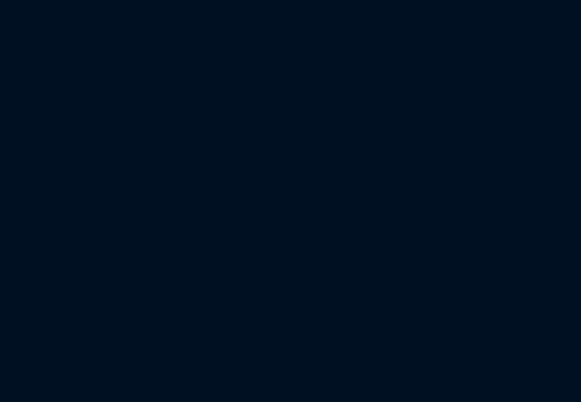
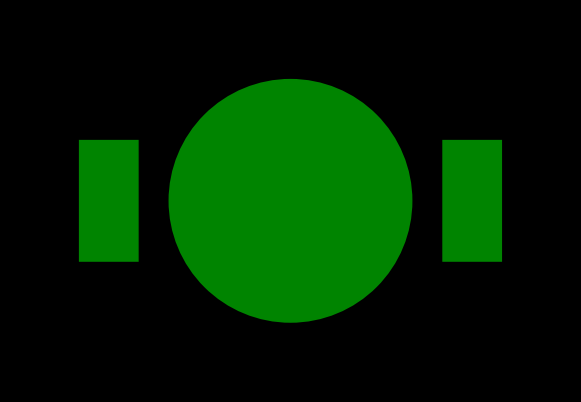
part: none -> (290, 200)

